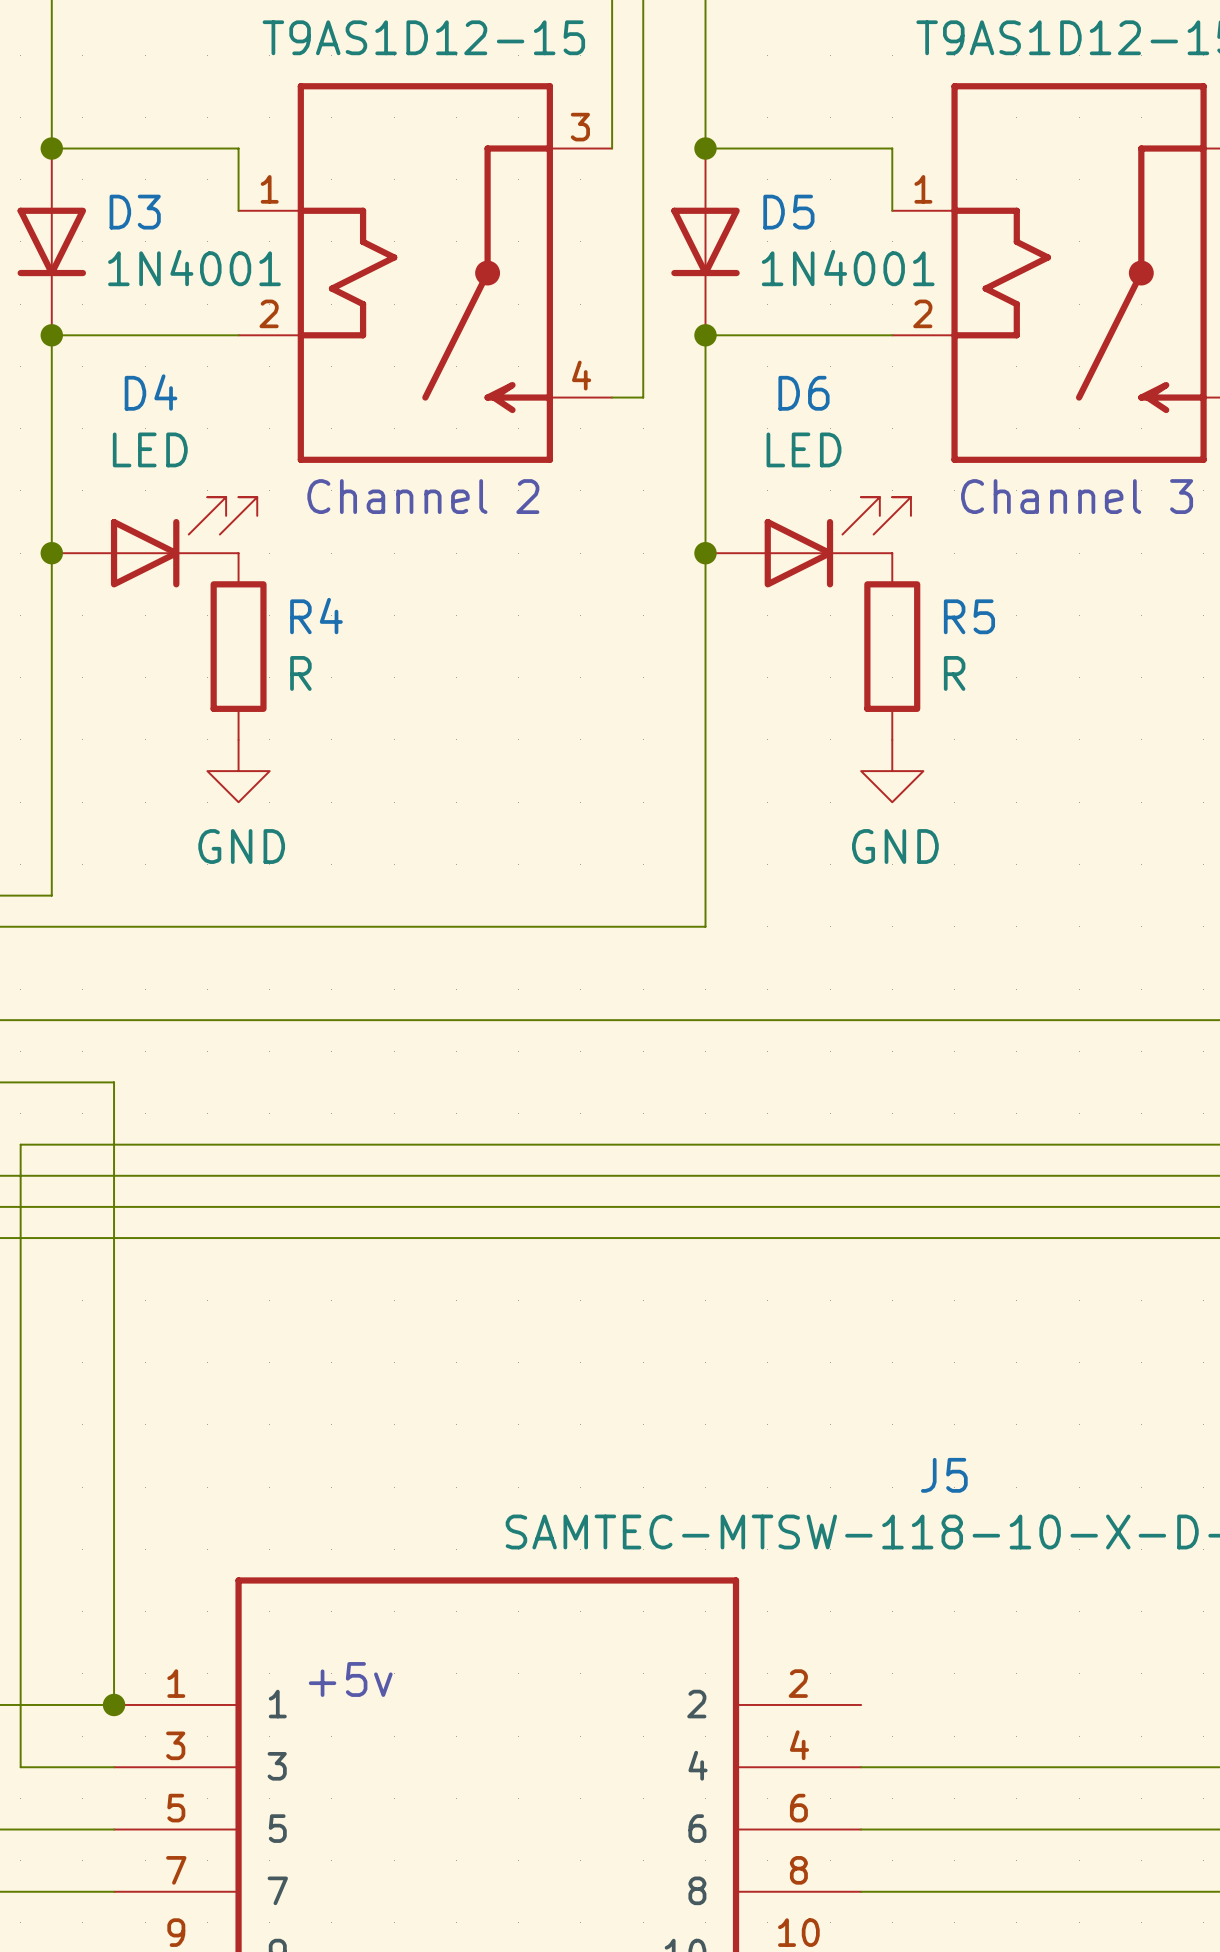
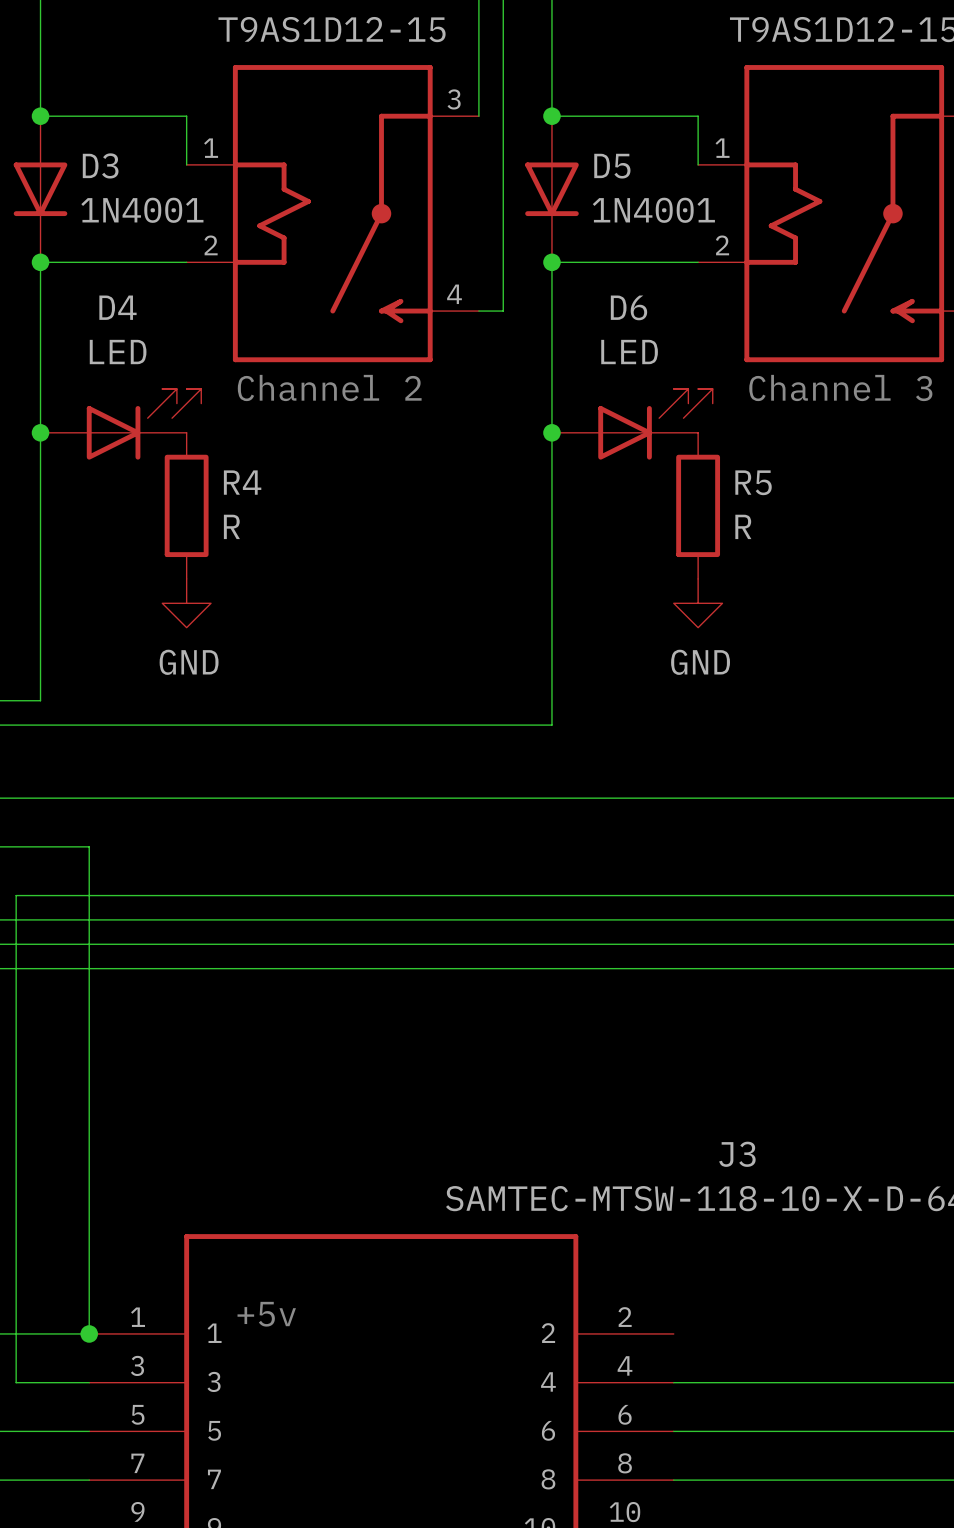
J5 name: J5 (944, 1475) -> J3 (737, 1154)

